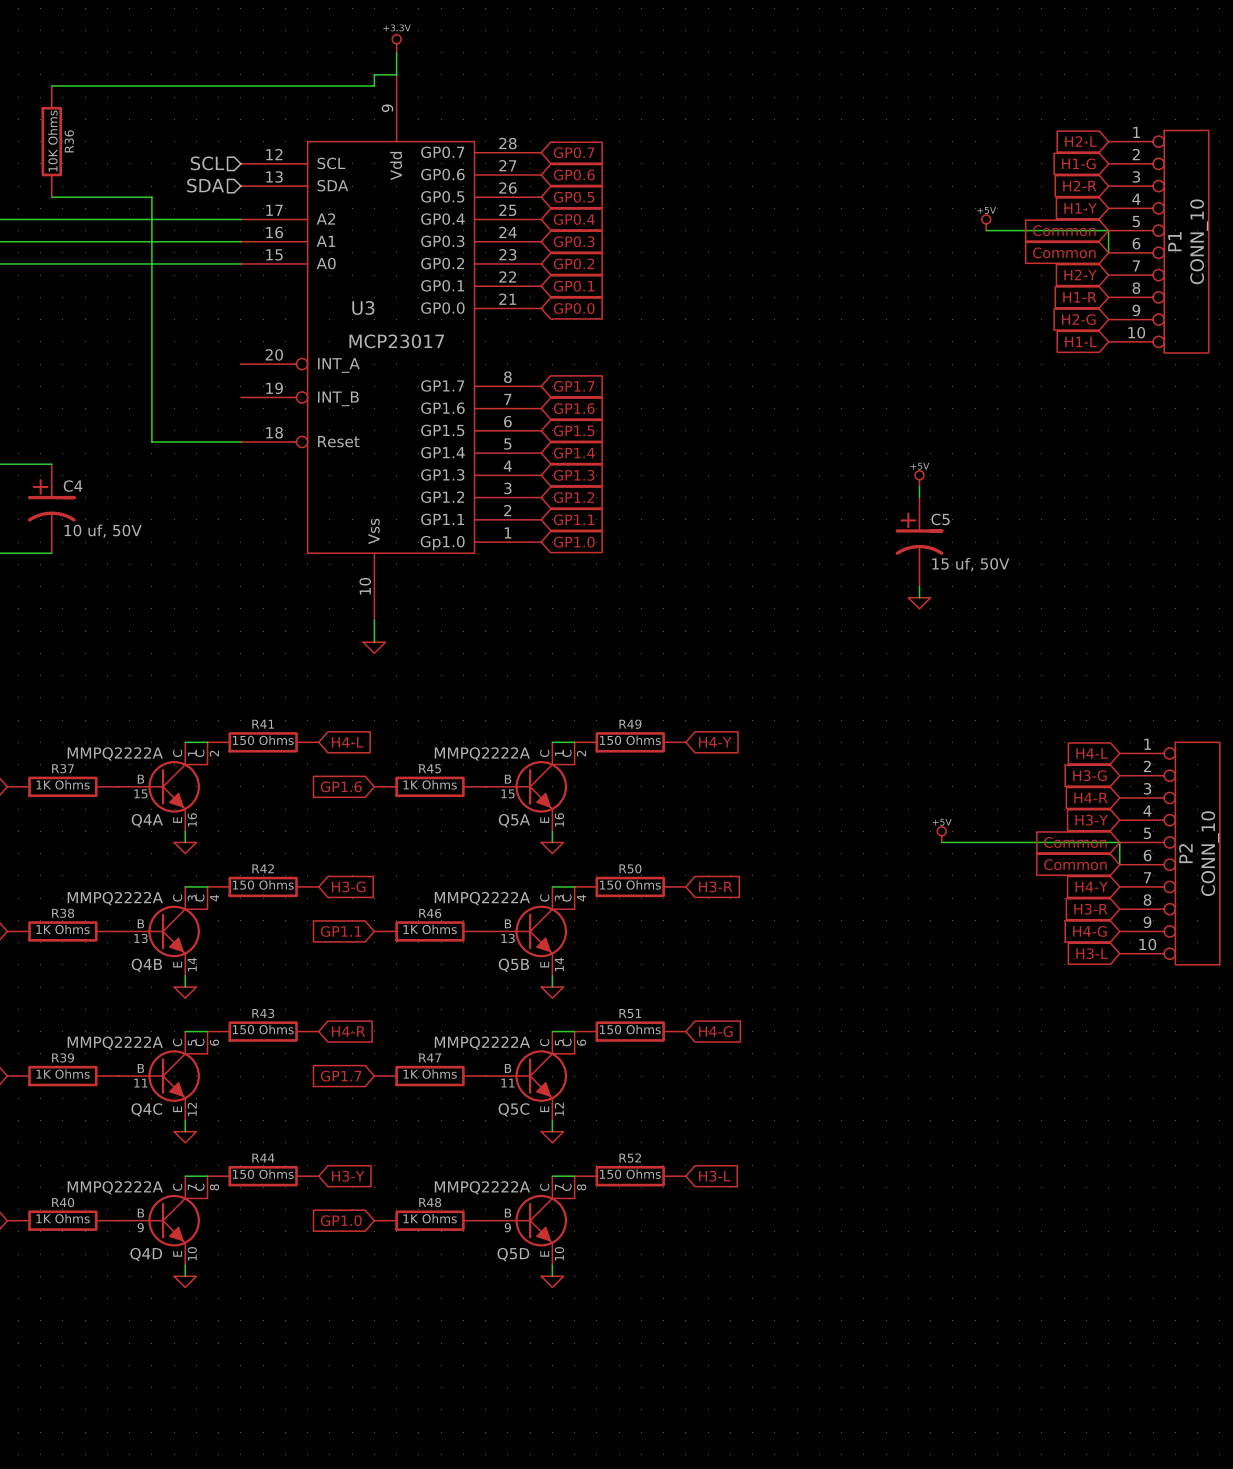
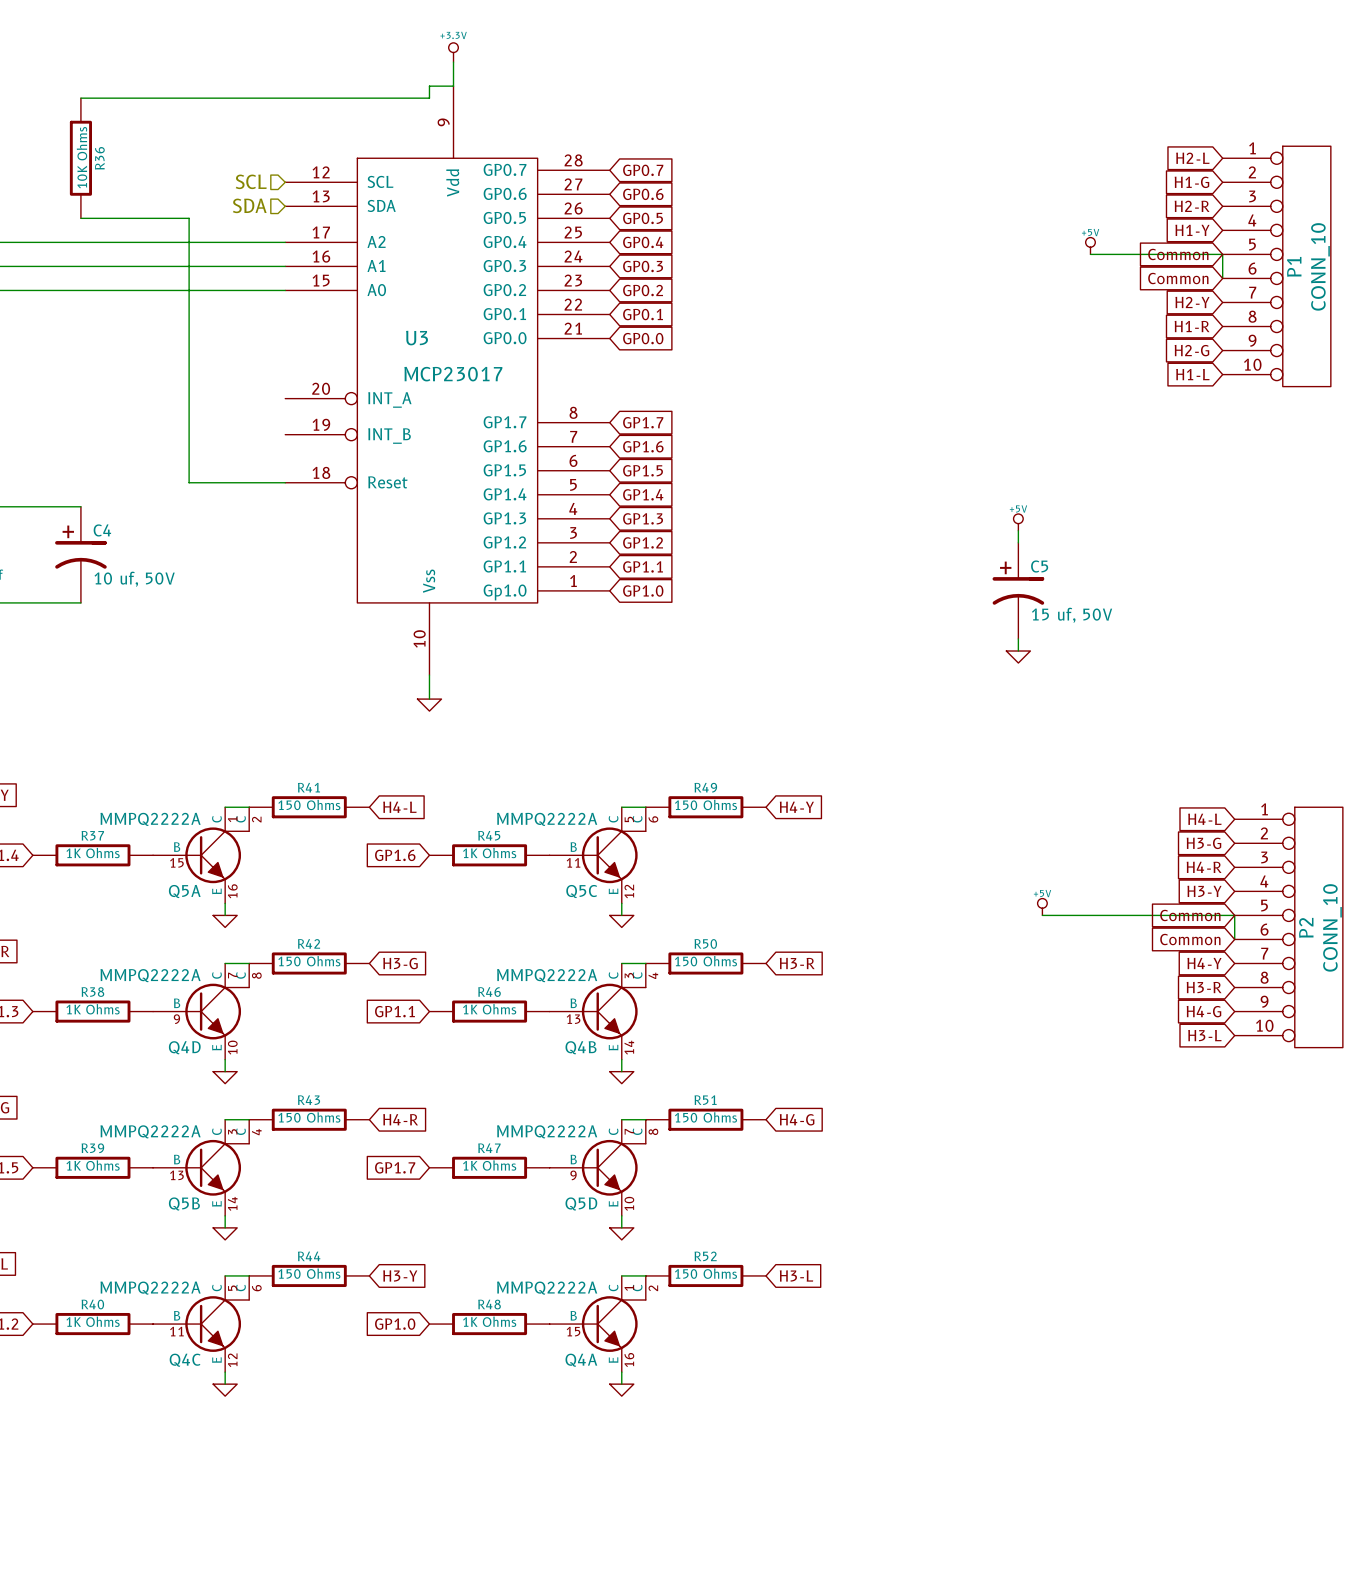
Q5A: MMPQ2222A (530, 786) -> none
Q4A name: Q4A (147, 820) -> Q5A (184, 891)
Q4B: MMPQ2222A (163, 931) -> none
Q5B name: Q5B (513, 965) -> Q4B (580, 1047)
Q4C position: (163, 1076) -> (201, 1324)
Q5B: none -> MMPQ2222A (201, 1167)
Q5C position: (530, 1076) -> (597, 855)
Q4D position: (163, 1220) -> (201, 1011)
Q5D position: (530, 1220) -> (597, 1167)
Q4A: none -> MMPQ2222A (597, 1324)

